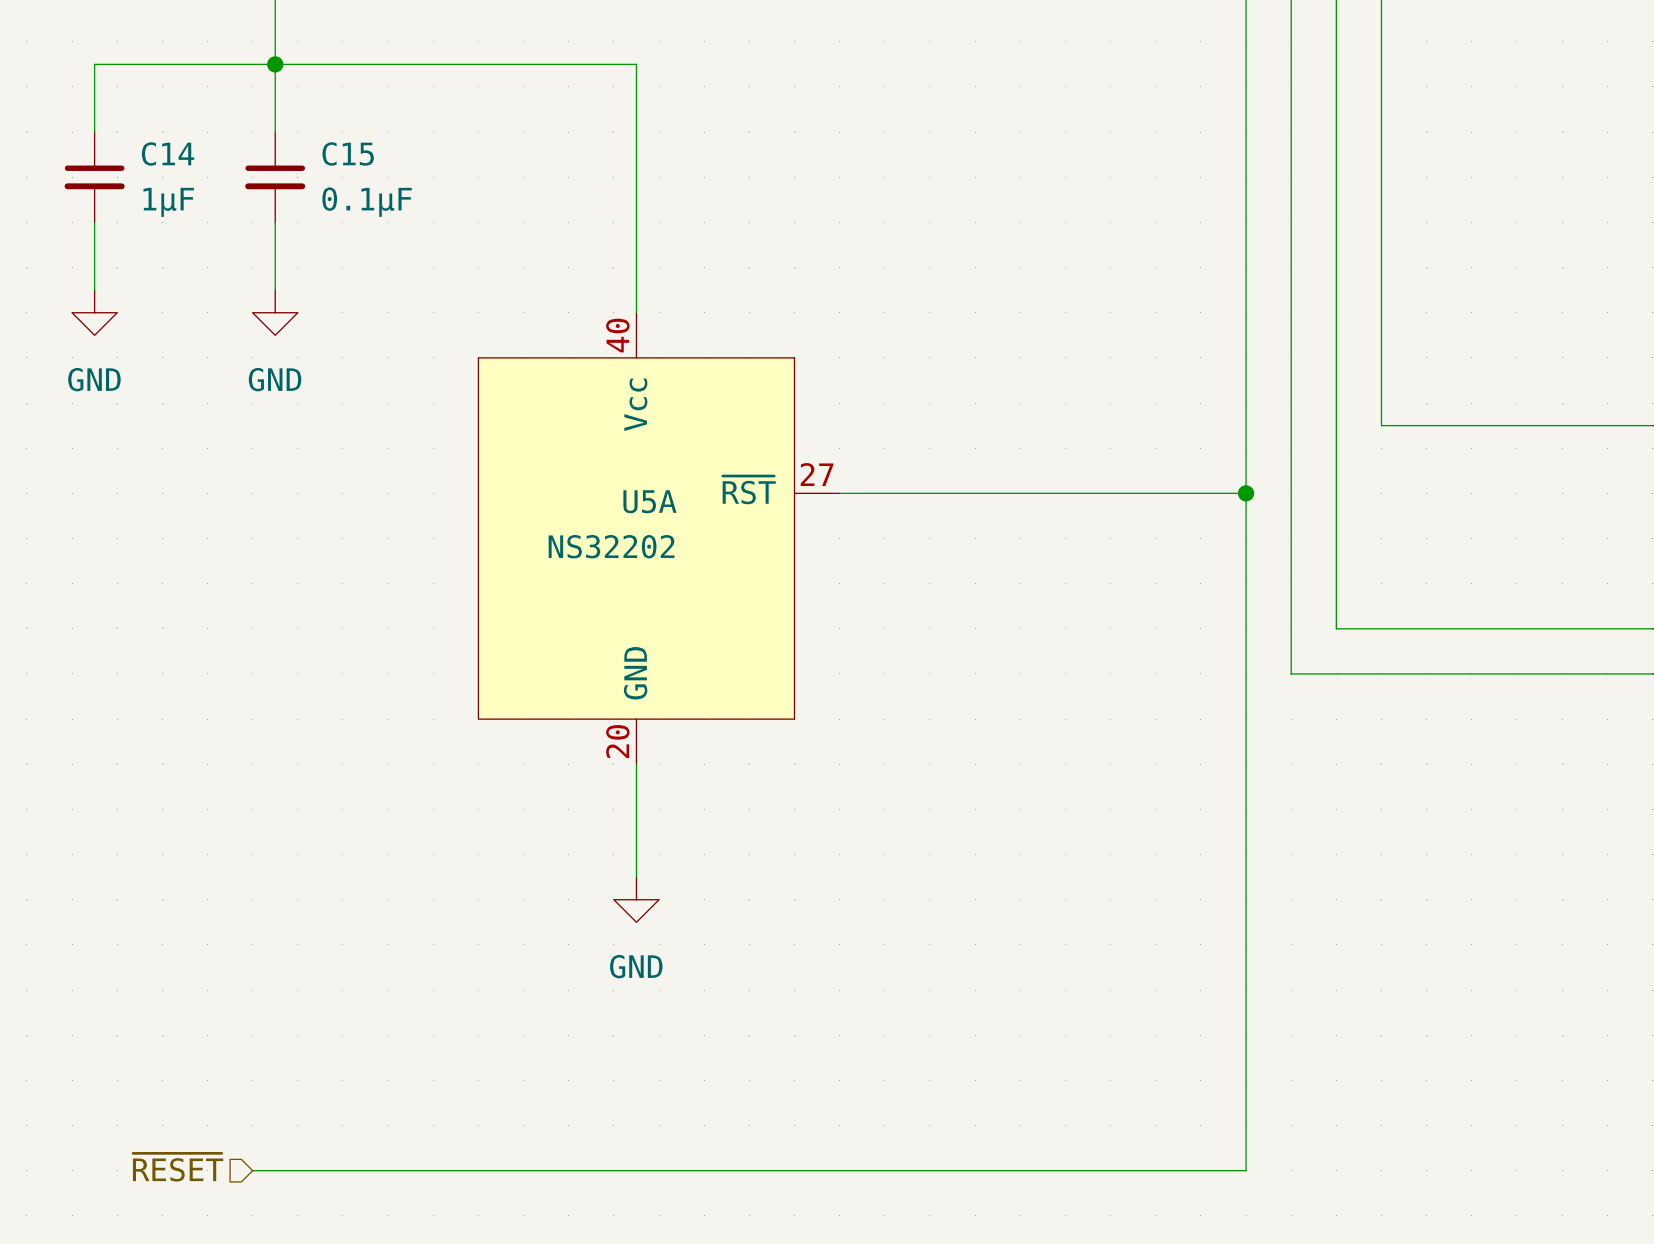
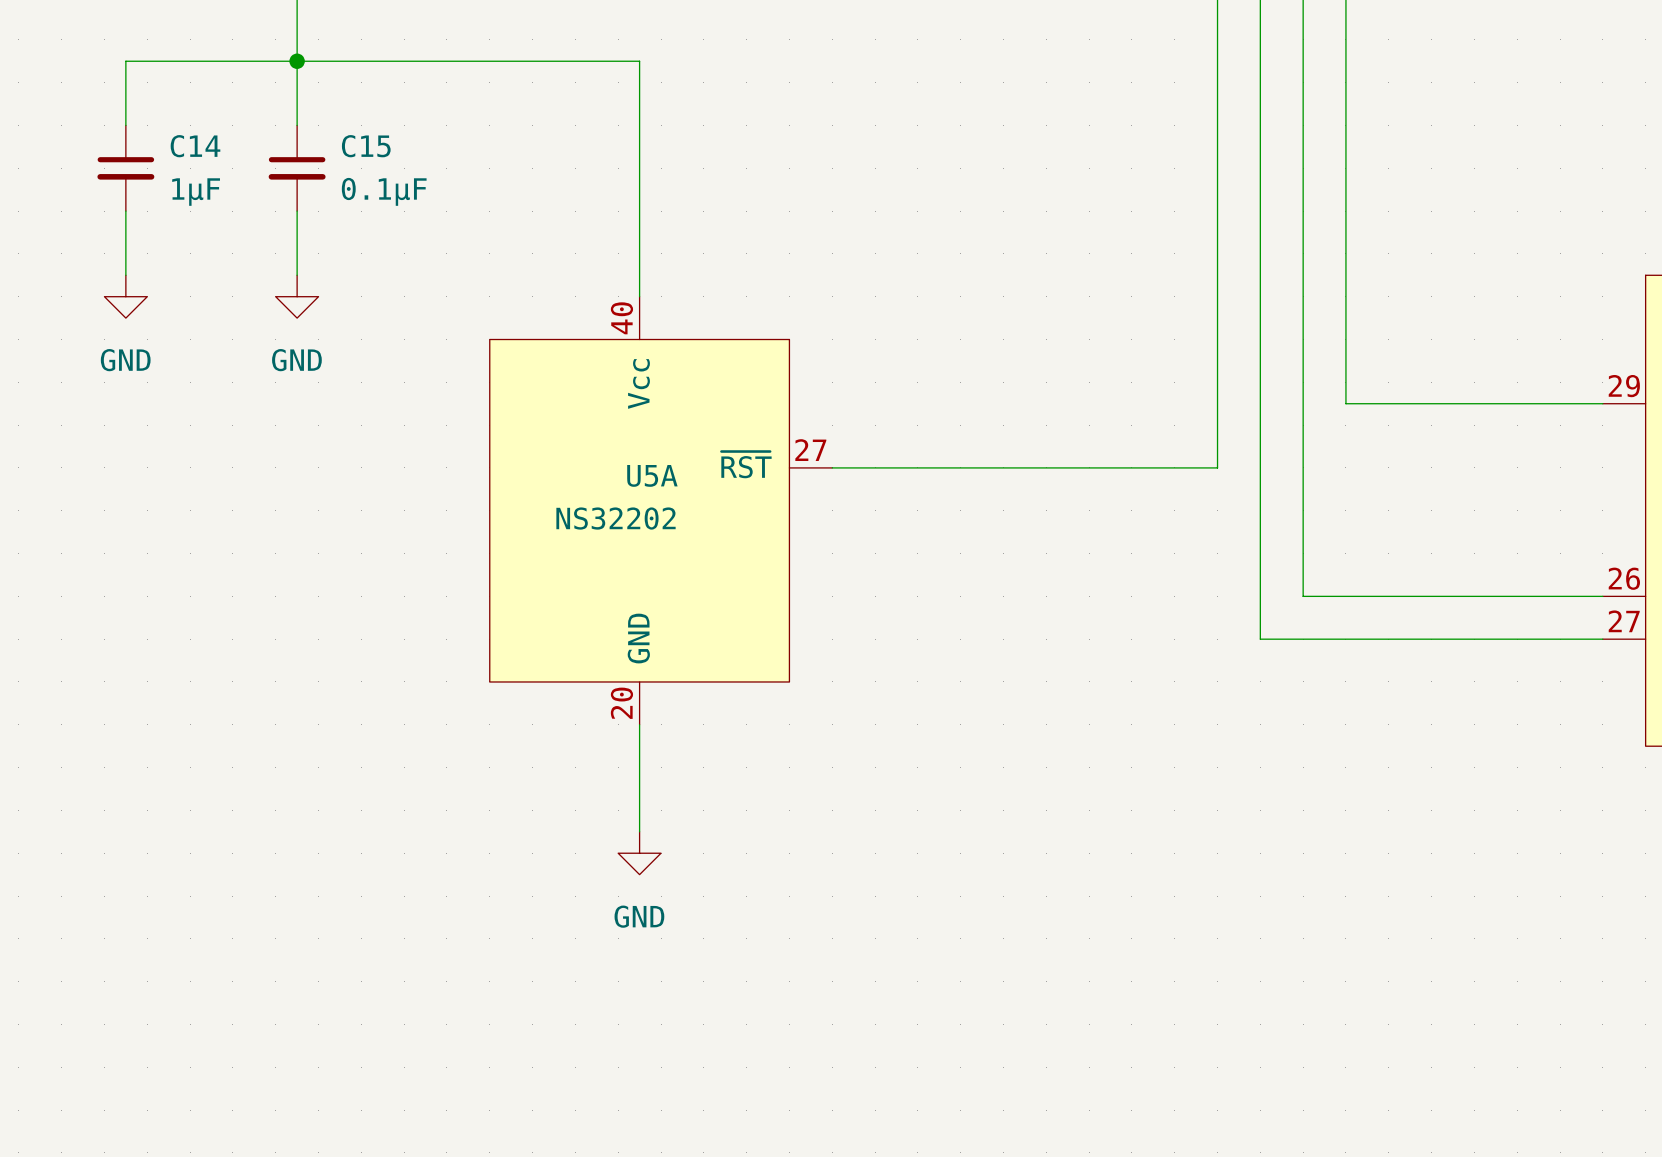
wire: (1246, 493) (1246, 1170) (252, 1170) -> none
junction: (1246, 493) -> none
hierarchical label: ~{RESET} (178, 1167) -> none

